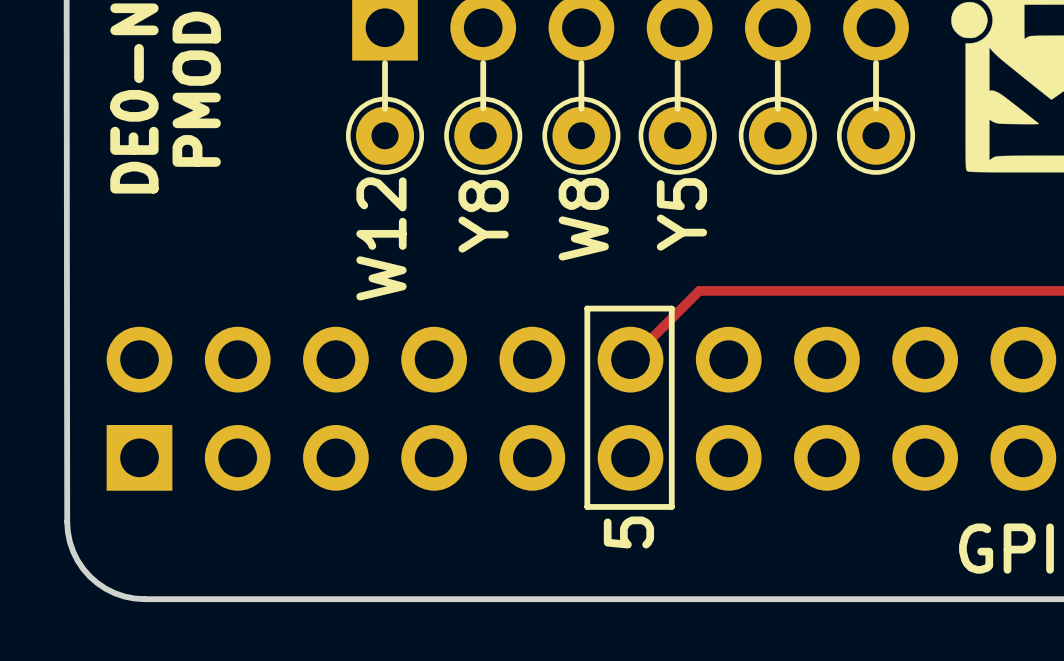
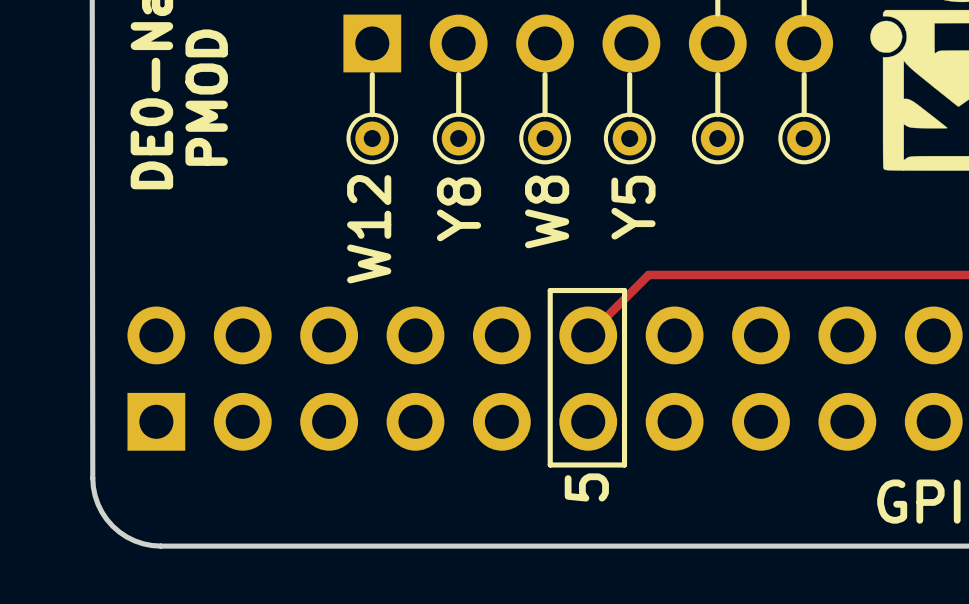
part footprint: [345, 96, 425, 175] -> [346, 112, 399, 165]
part footprint: [444, 96, 523, 175] -> [432, 112, 485, 165]
part footprint: [542, 96, 621, 175] -> [519, 112, 571, 165]
part footprint: [638, 96, 717, 175] -> [603, 112, 656, 165]
part footprint: [738, 96, 817, 175] -> [691, 112, 744, 165]
part footprint: [836, 96, 916, 175] -> [778, 112, 831, 165]

